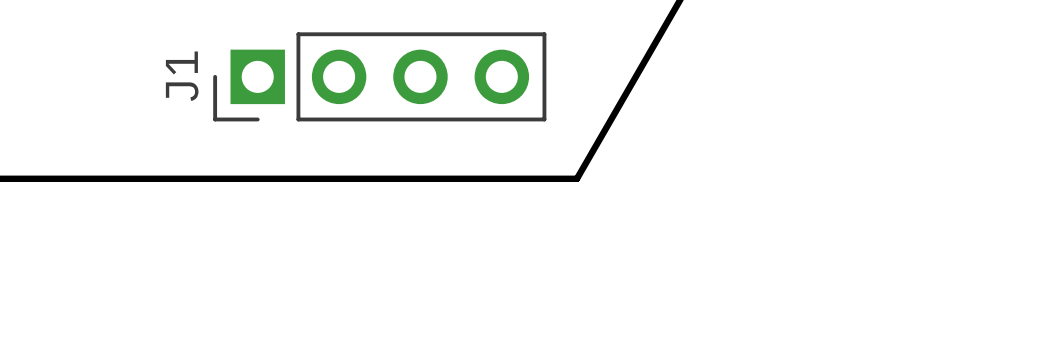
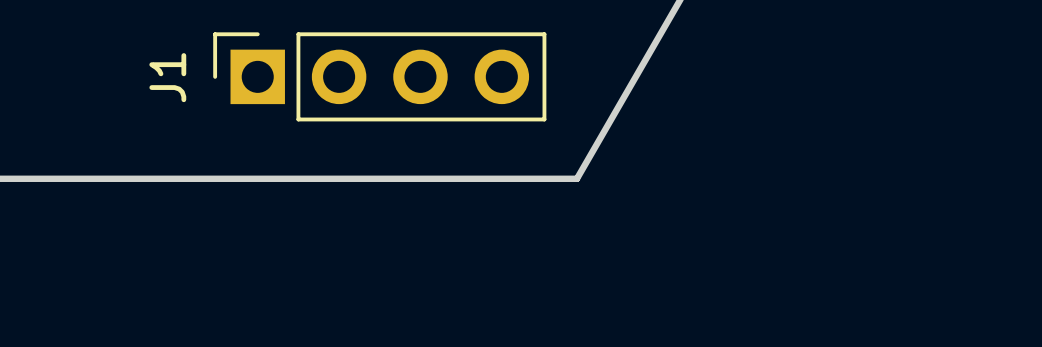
J1 footprint: [213, 32, 547, 122] -> [213, 32, 547, 122]

